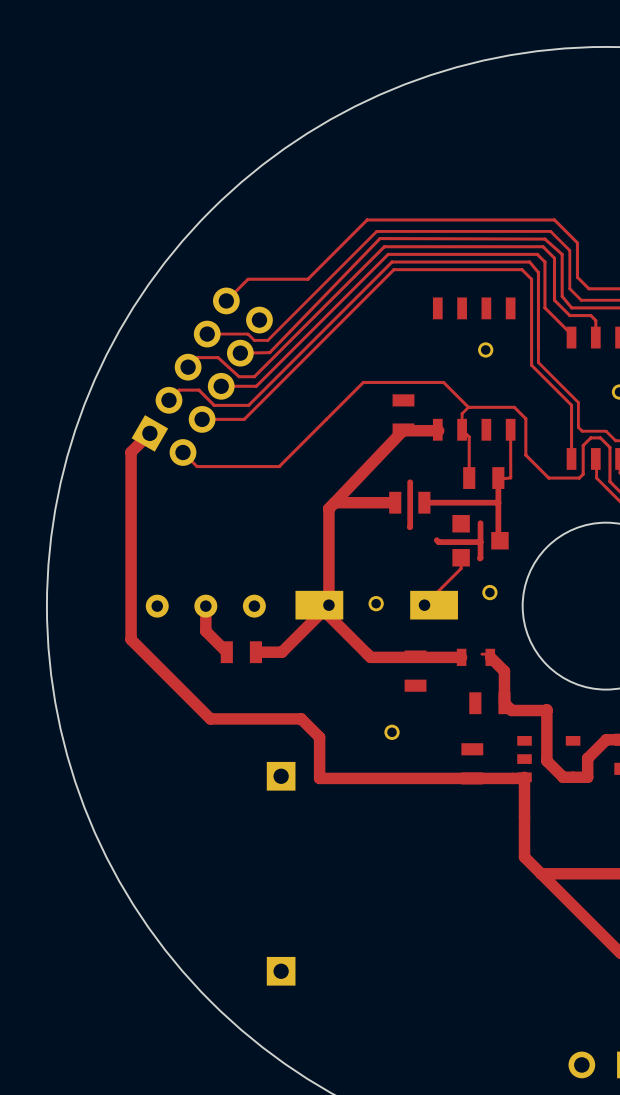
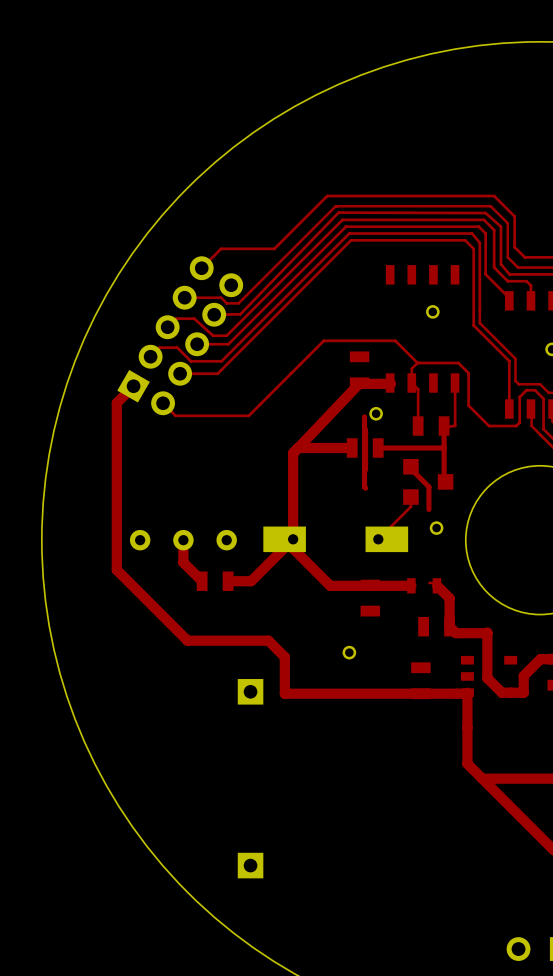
top track: none -> (364, 416) (365, 488)
top track: none -> (410, 466) (428, 486) (428, 509)
top track: (480, 523) (479, 558) -> none
top track: (436, 540) (438, 542) (480, 542) -> none
part position: (376, 603) -> (376, 413)

